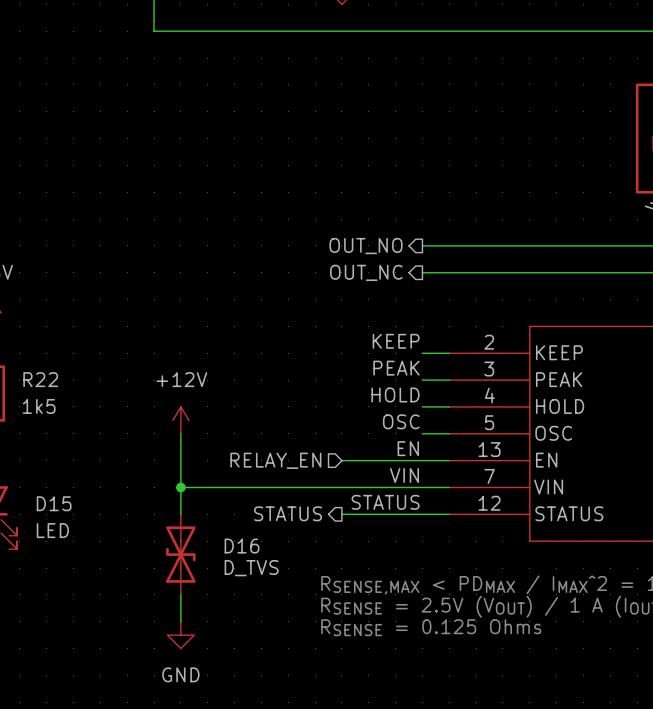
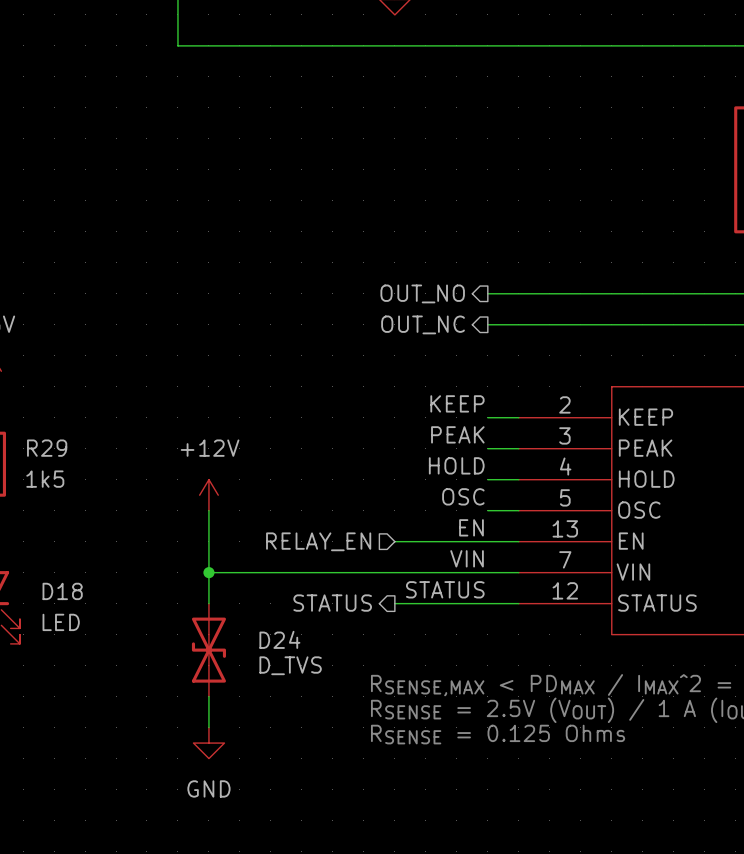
R22 name: R22 (40, 379) -> R29 (47, 448)
D15 name: D15 (54, 503) -> D18 (62, 591)
D16 name: D16 (242, 546) -> D24 (279, 639)

